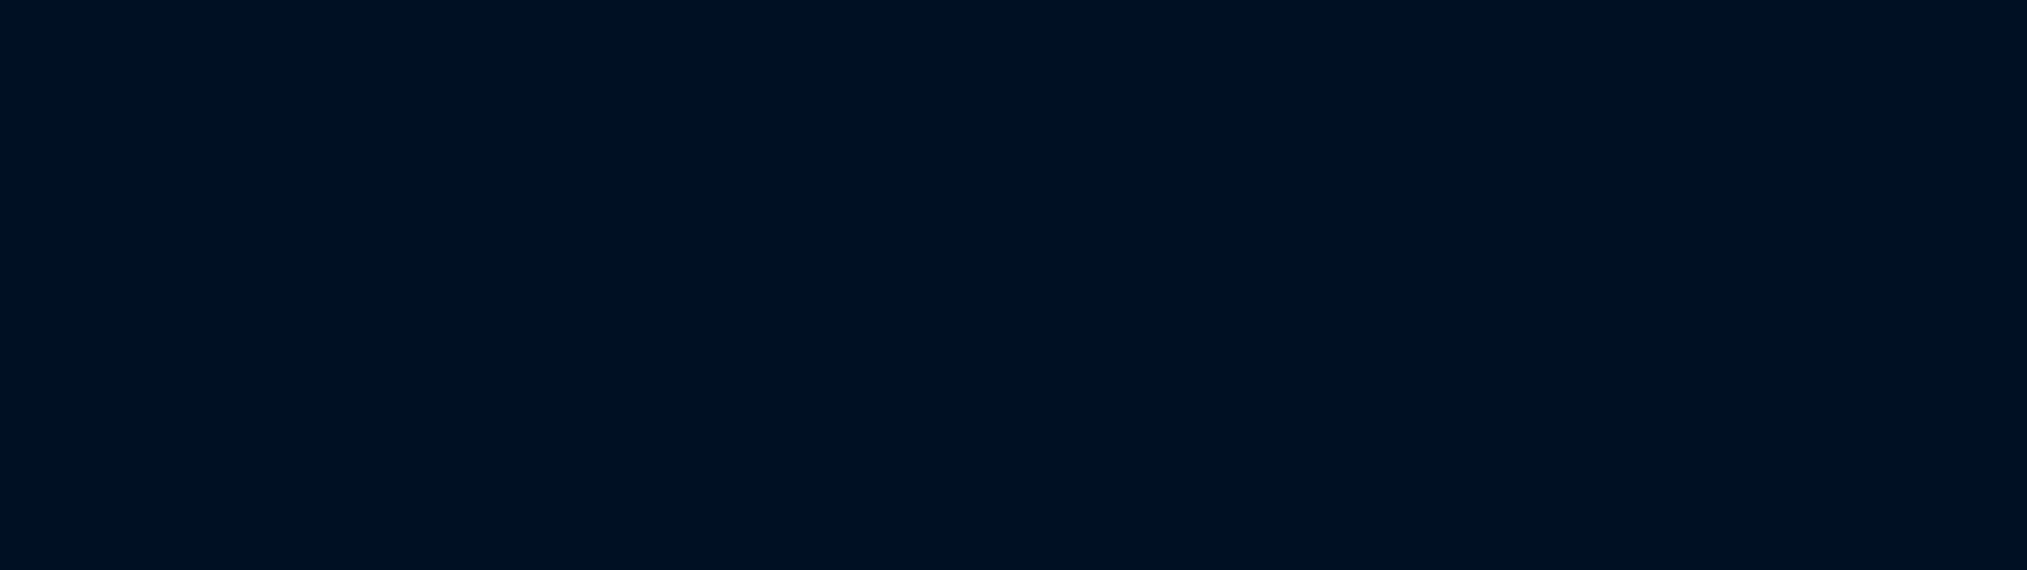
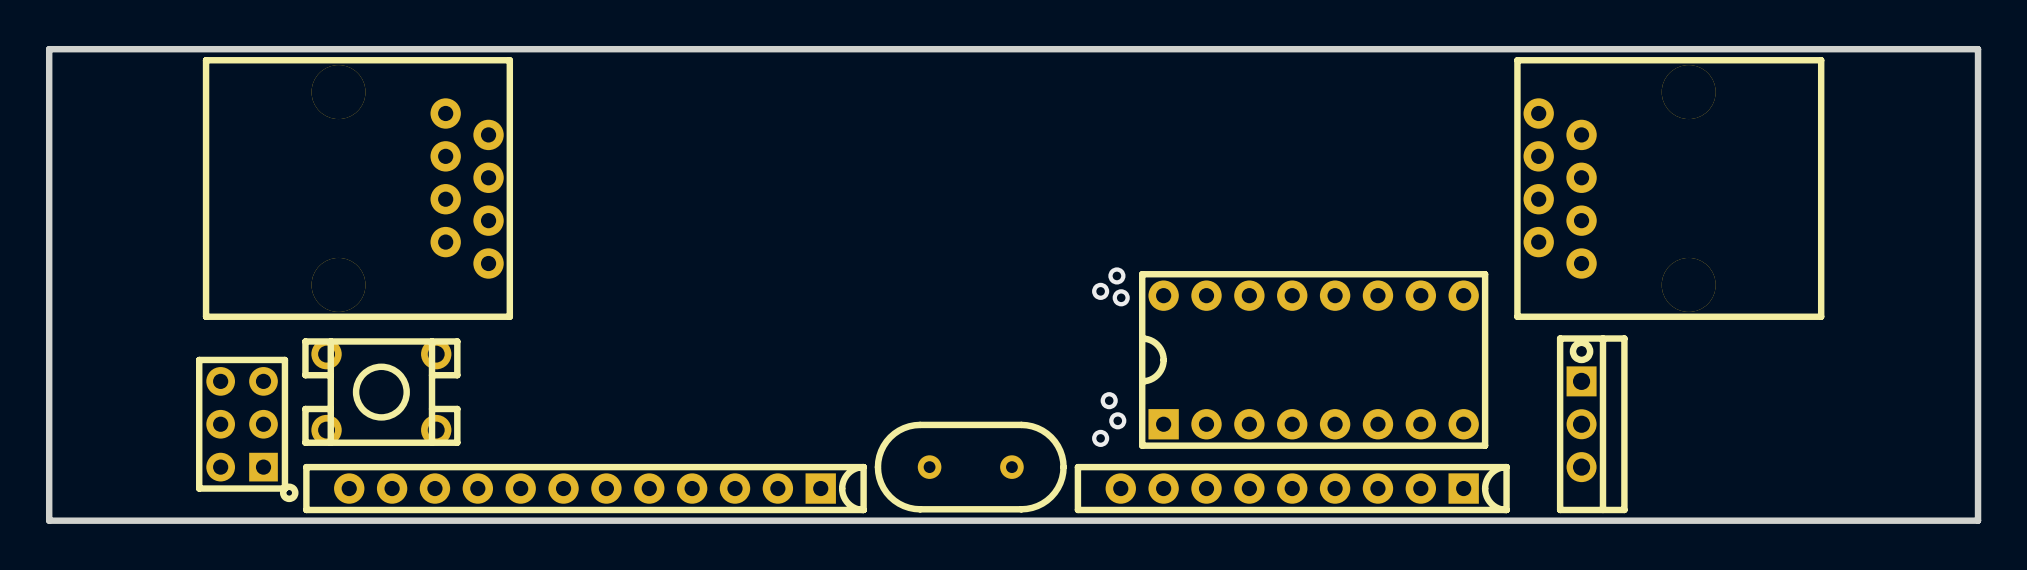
board edge: none -> (1978, 49) (1978, 520) (49, 520) (49, 49) (1978, 49)
part: none -> (357, 188)
part: none -> (1669, 188)
via: none -> (1116, 275)
via: none -> (1100, 291)
via: none -> (1121, 297)
part: none -> (1313, 359)
part: none -> (381, 392)
via: none -> (1109, 400)
via: none -> (1117, 420)
part: none -> (1592, 424)
part: none -> (247, 429)
via: none -> (1100, 438)
part: none -> (970, 467)
part: none -> (584, 488)
part: none -> (1292, 488)

